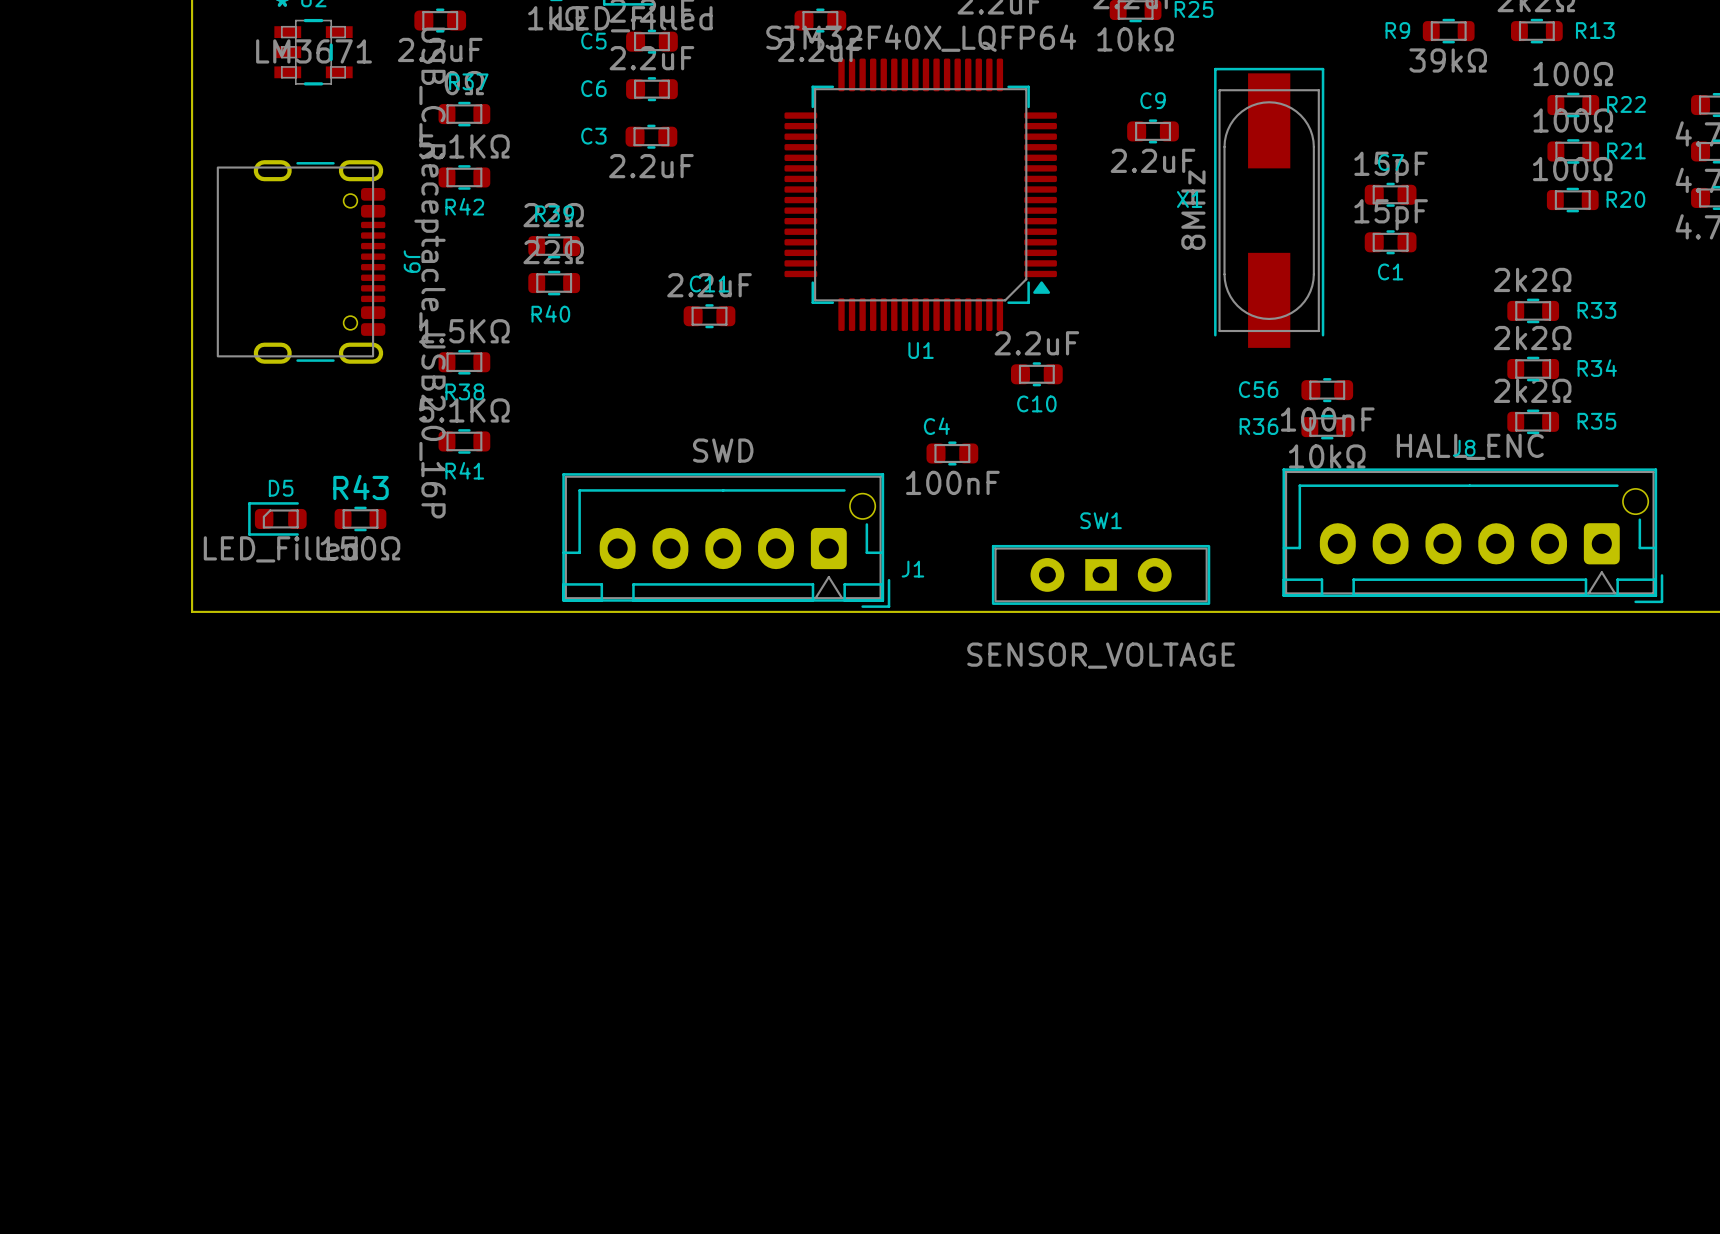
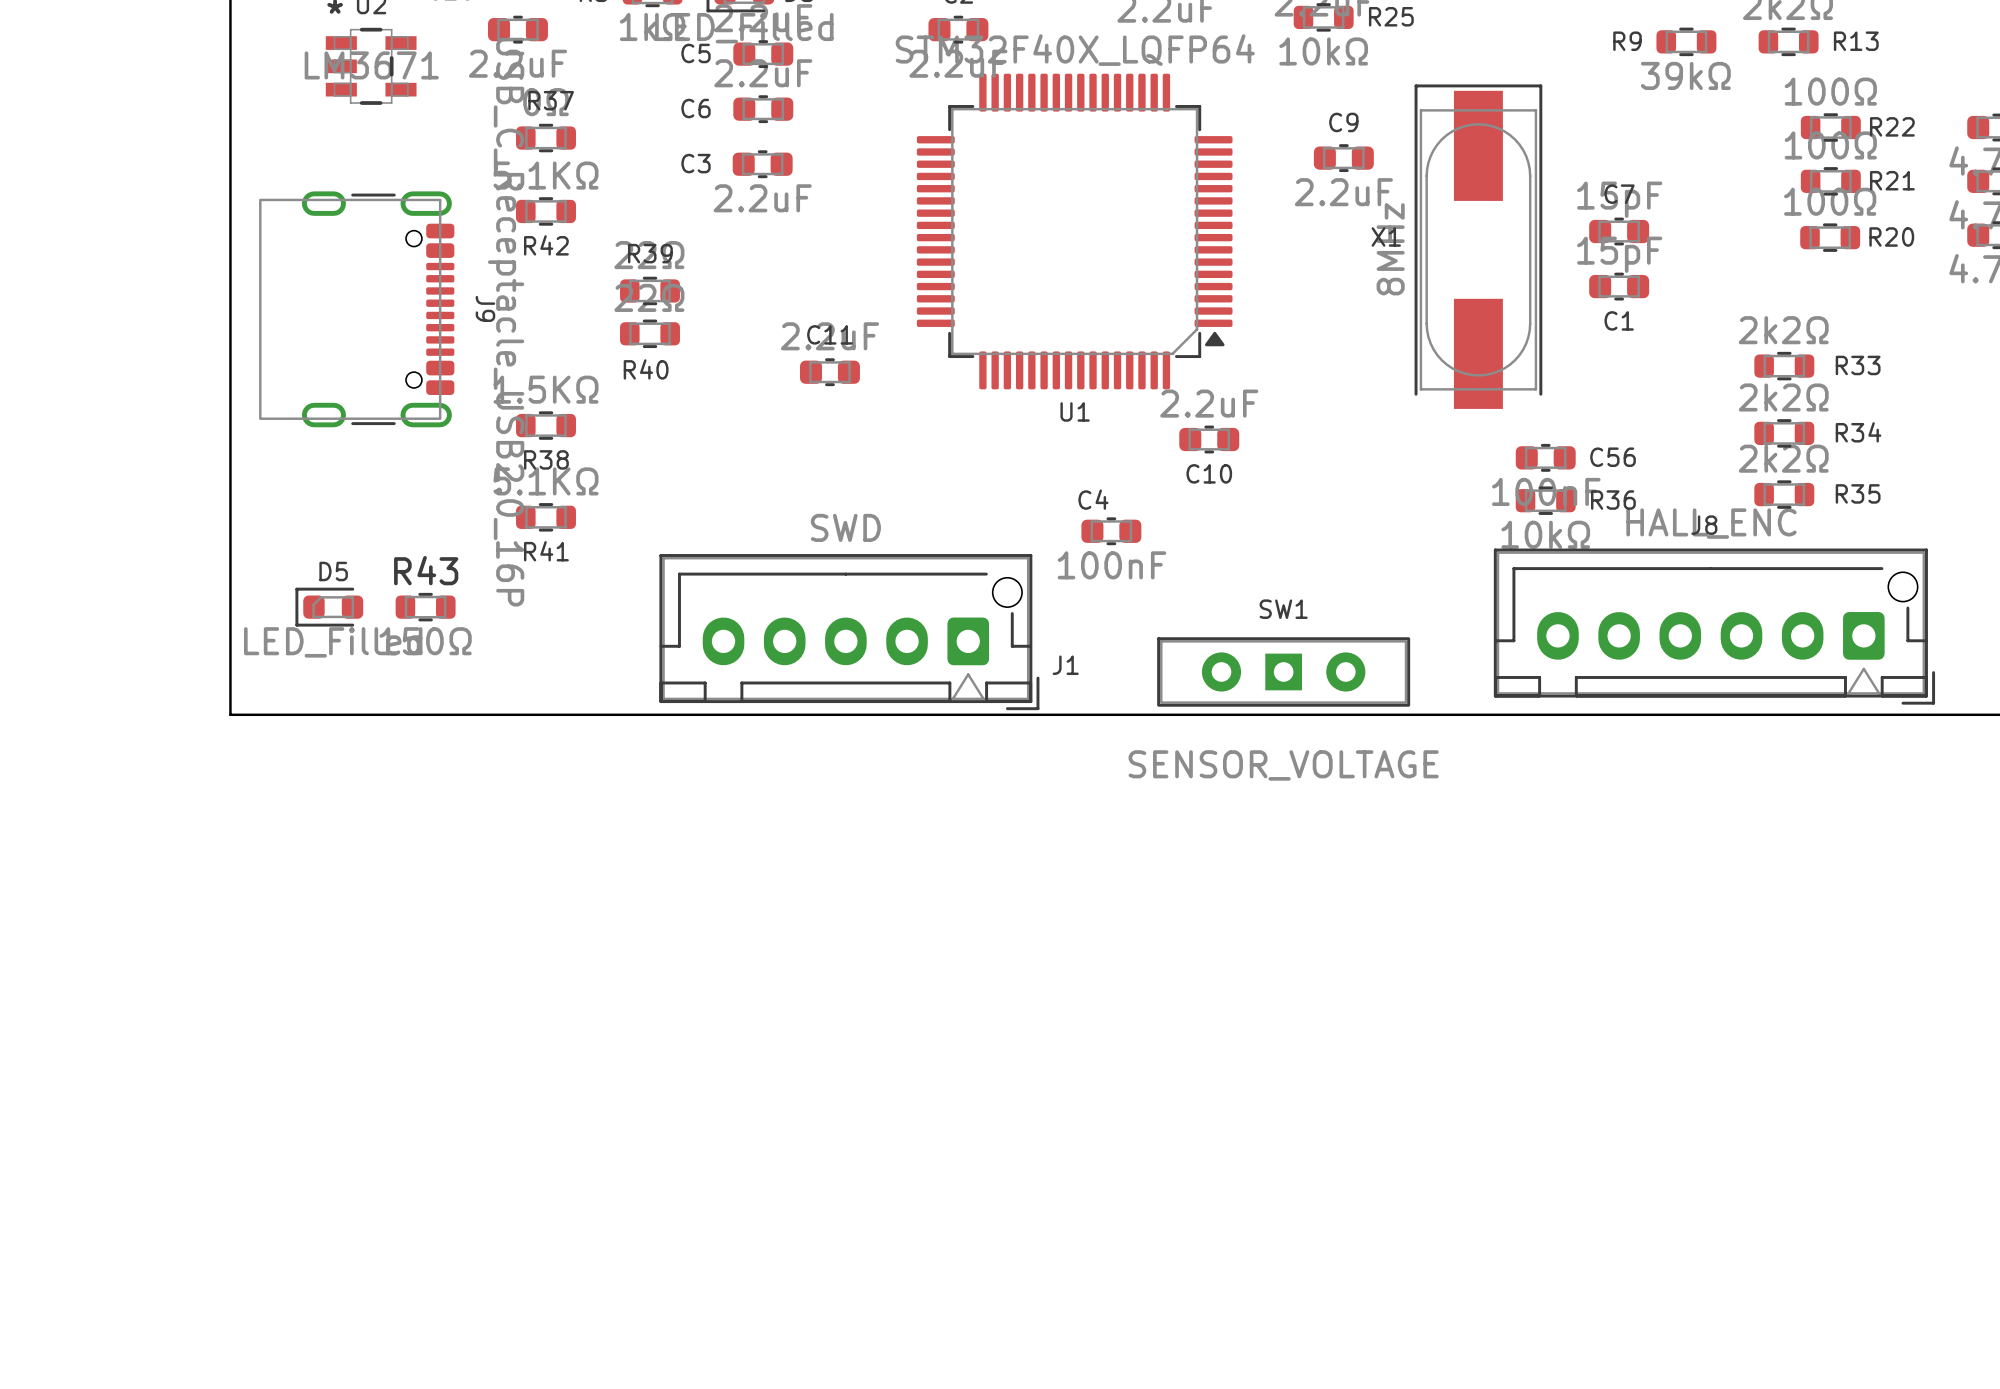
C56 name position: C56 (1258, 389) -> C56 (1613, 457)
R36 name position: R36 (1258, 426) -> R36 (1613, 500)

